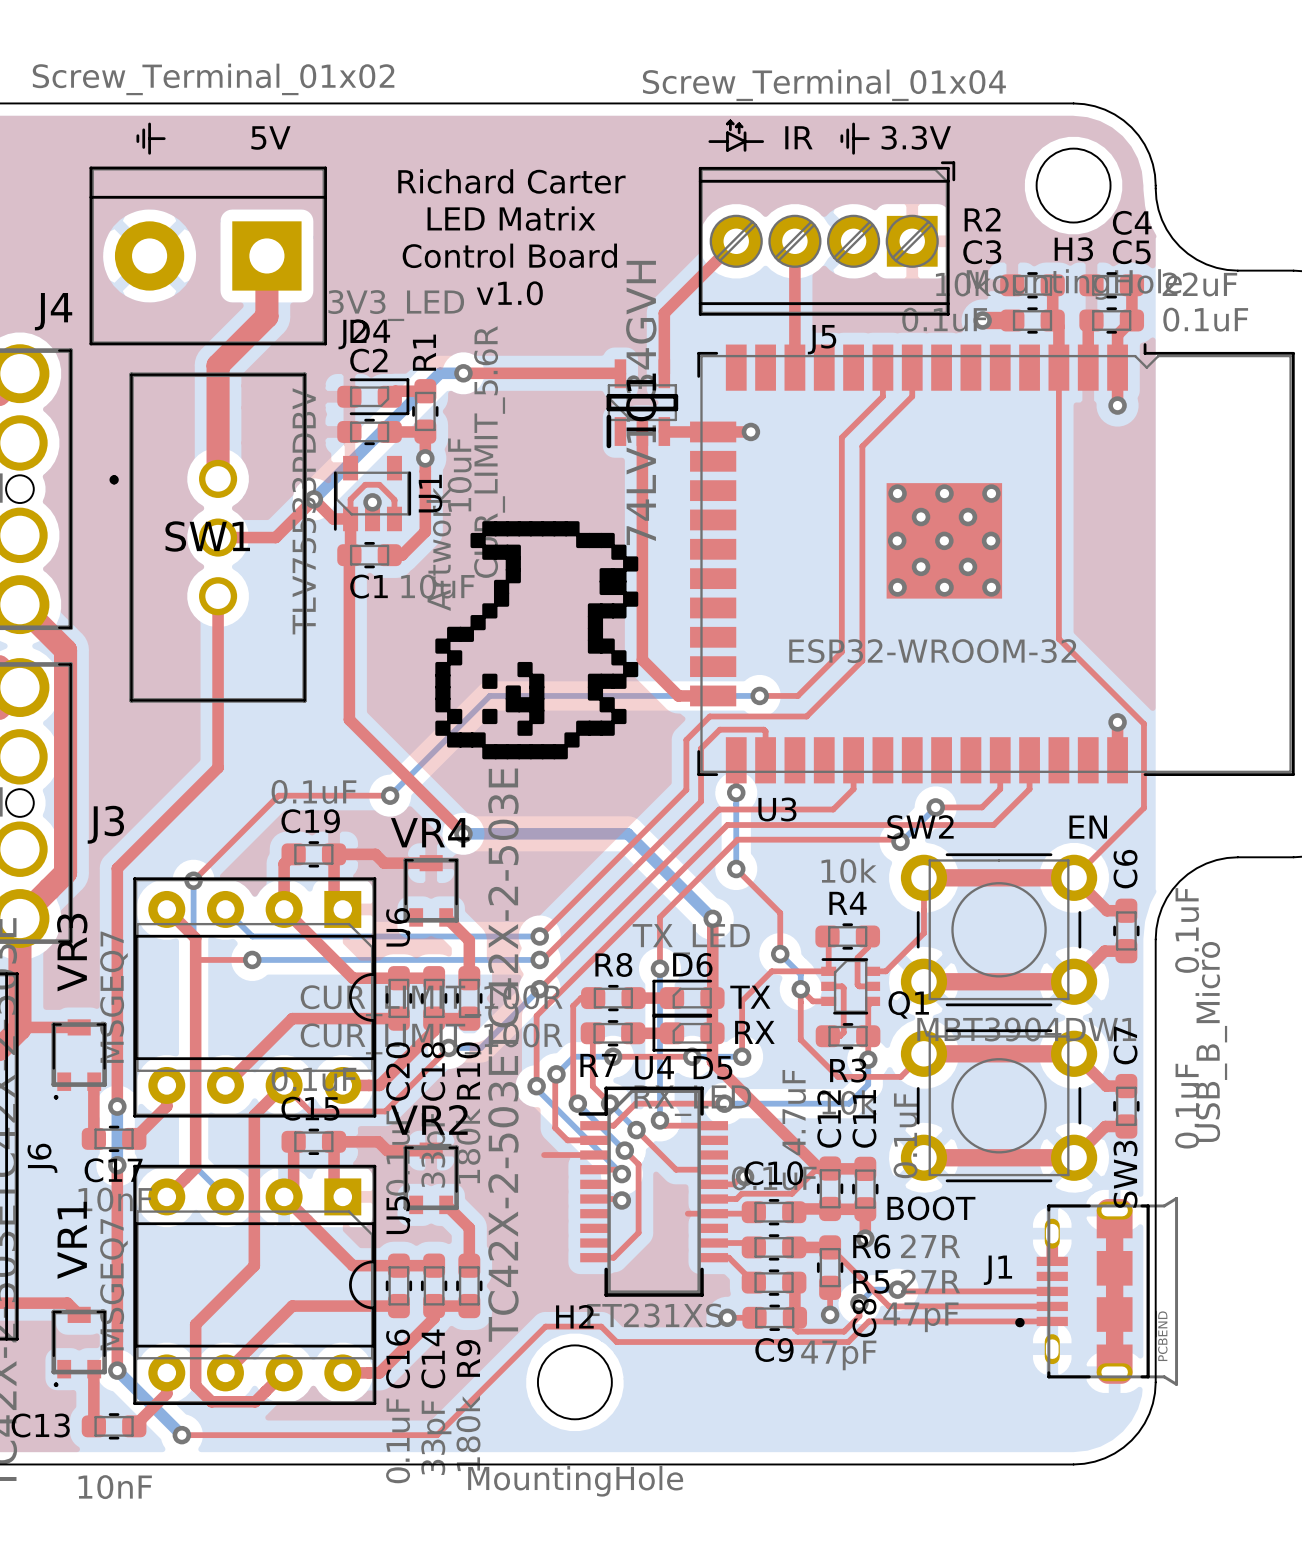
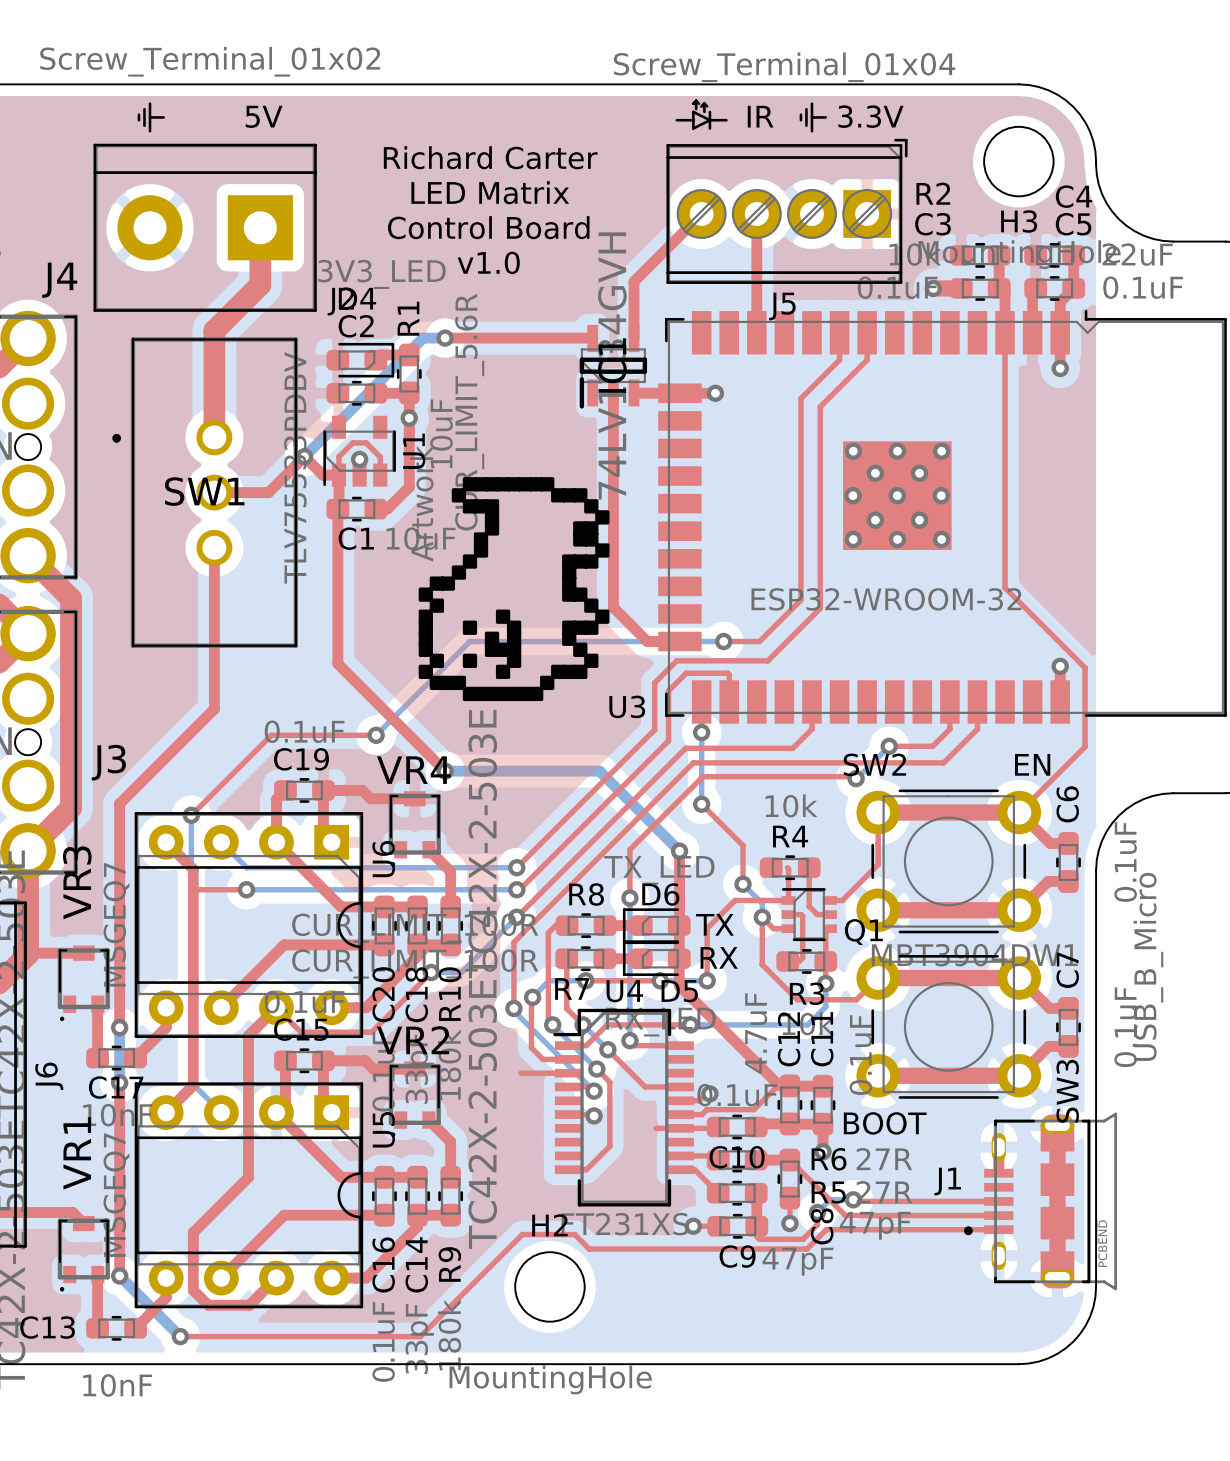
U3 name position: U3 (777, 809) -> U3 (627, 706)
R4 position: (847, 936) -> (790, 867)
top track: (867, 936) (867, 947) (857, 957) (857, 984) -> (809, 867) (809, 906) (815, 912)
C10 name position: C10 (773, 1173) -> C10 (737, 1157)

